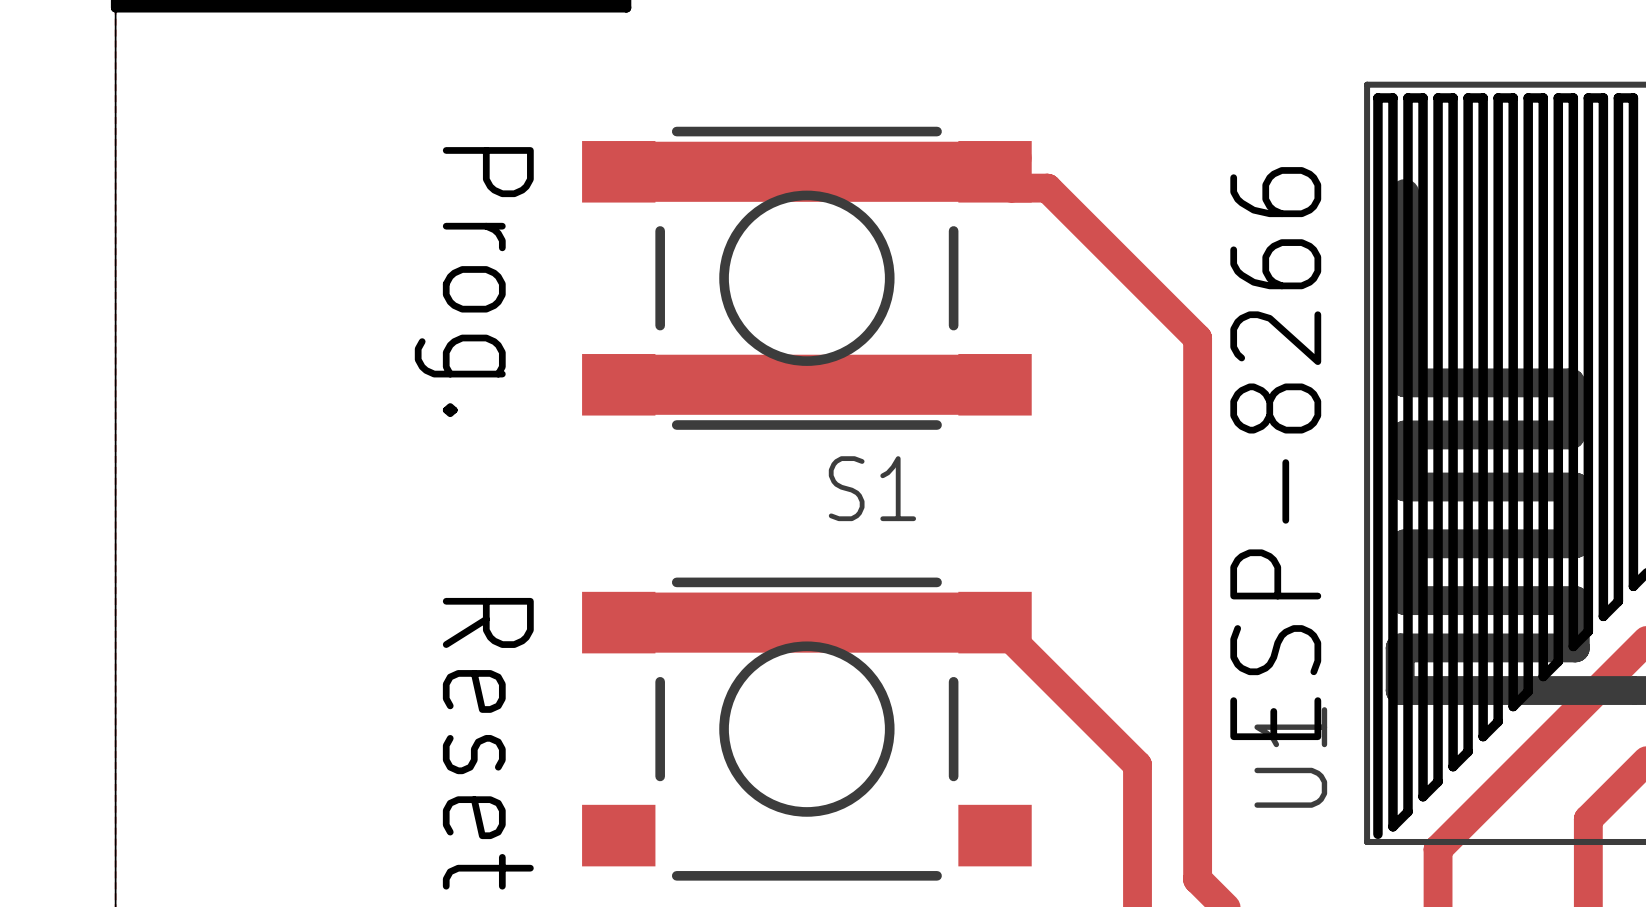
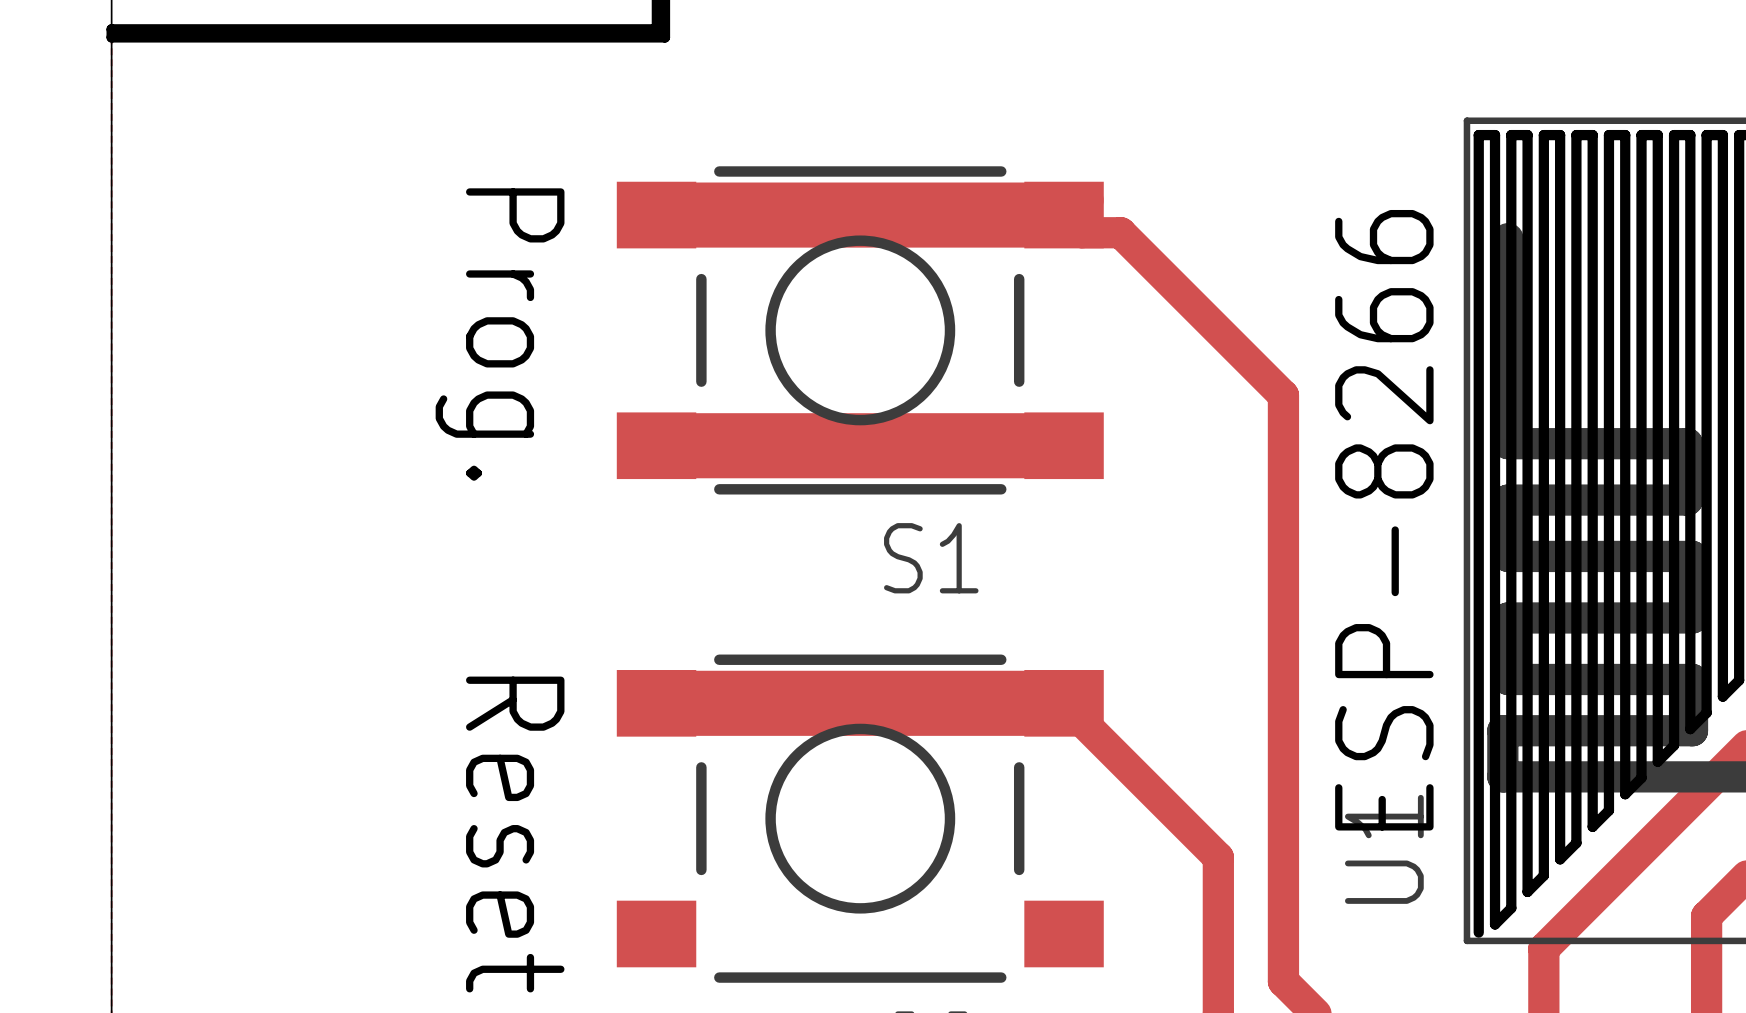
text position: ESP-8266 (1275, 453) -> ESP-8266 (1384, 520)

